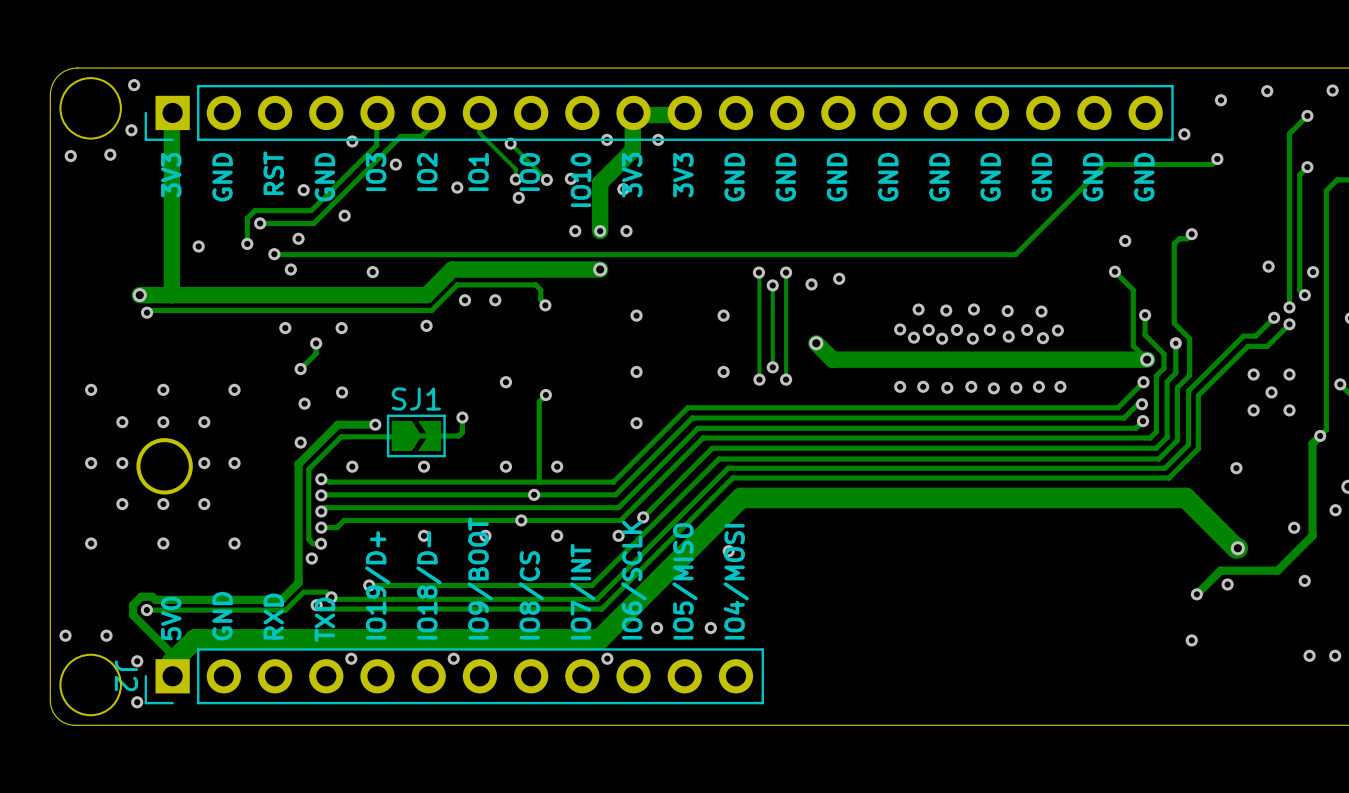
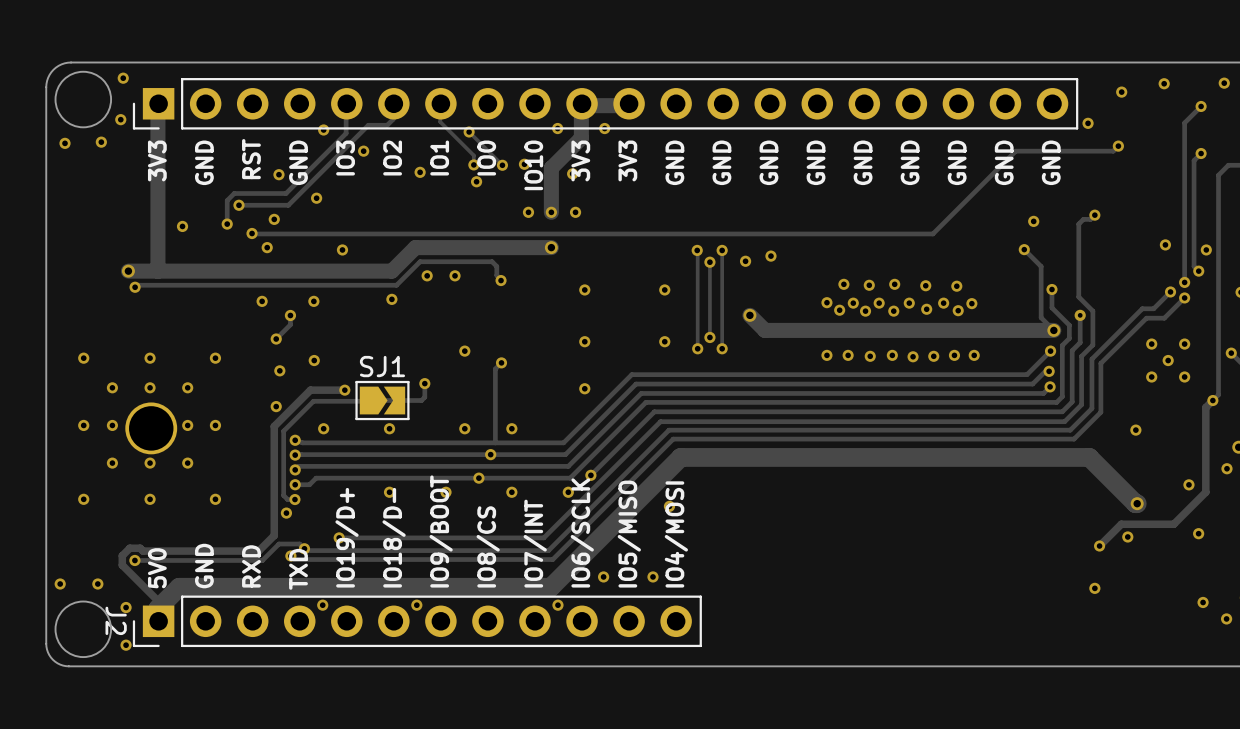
via: (1335, 655) -> none
via: none -> (1226, 618)

